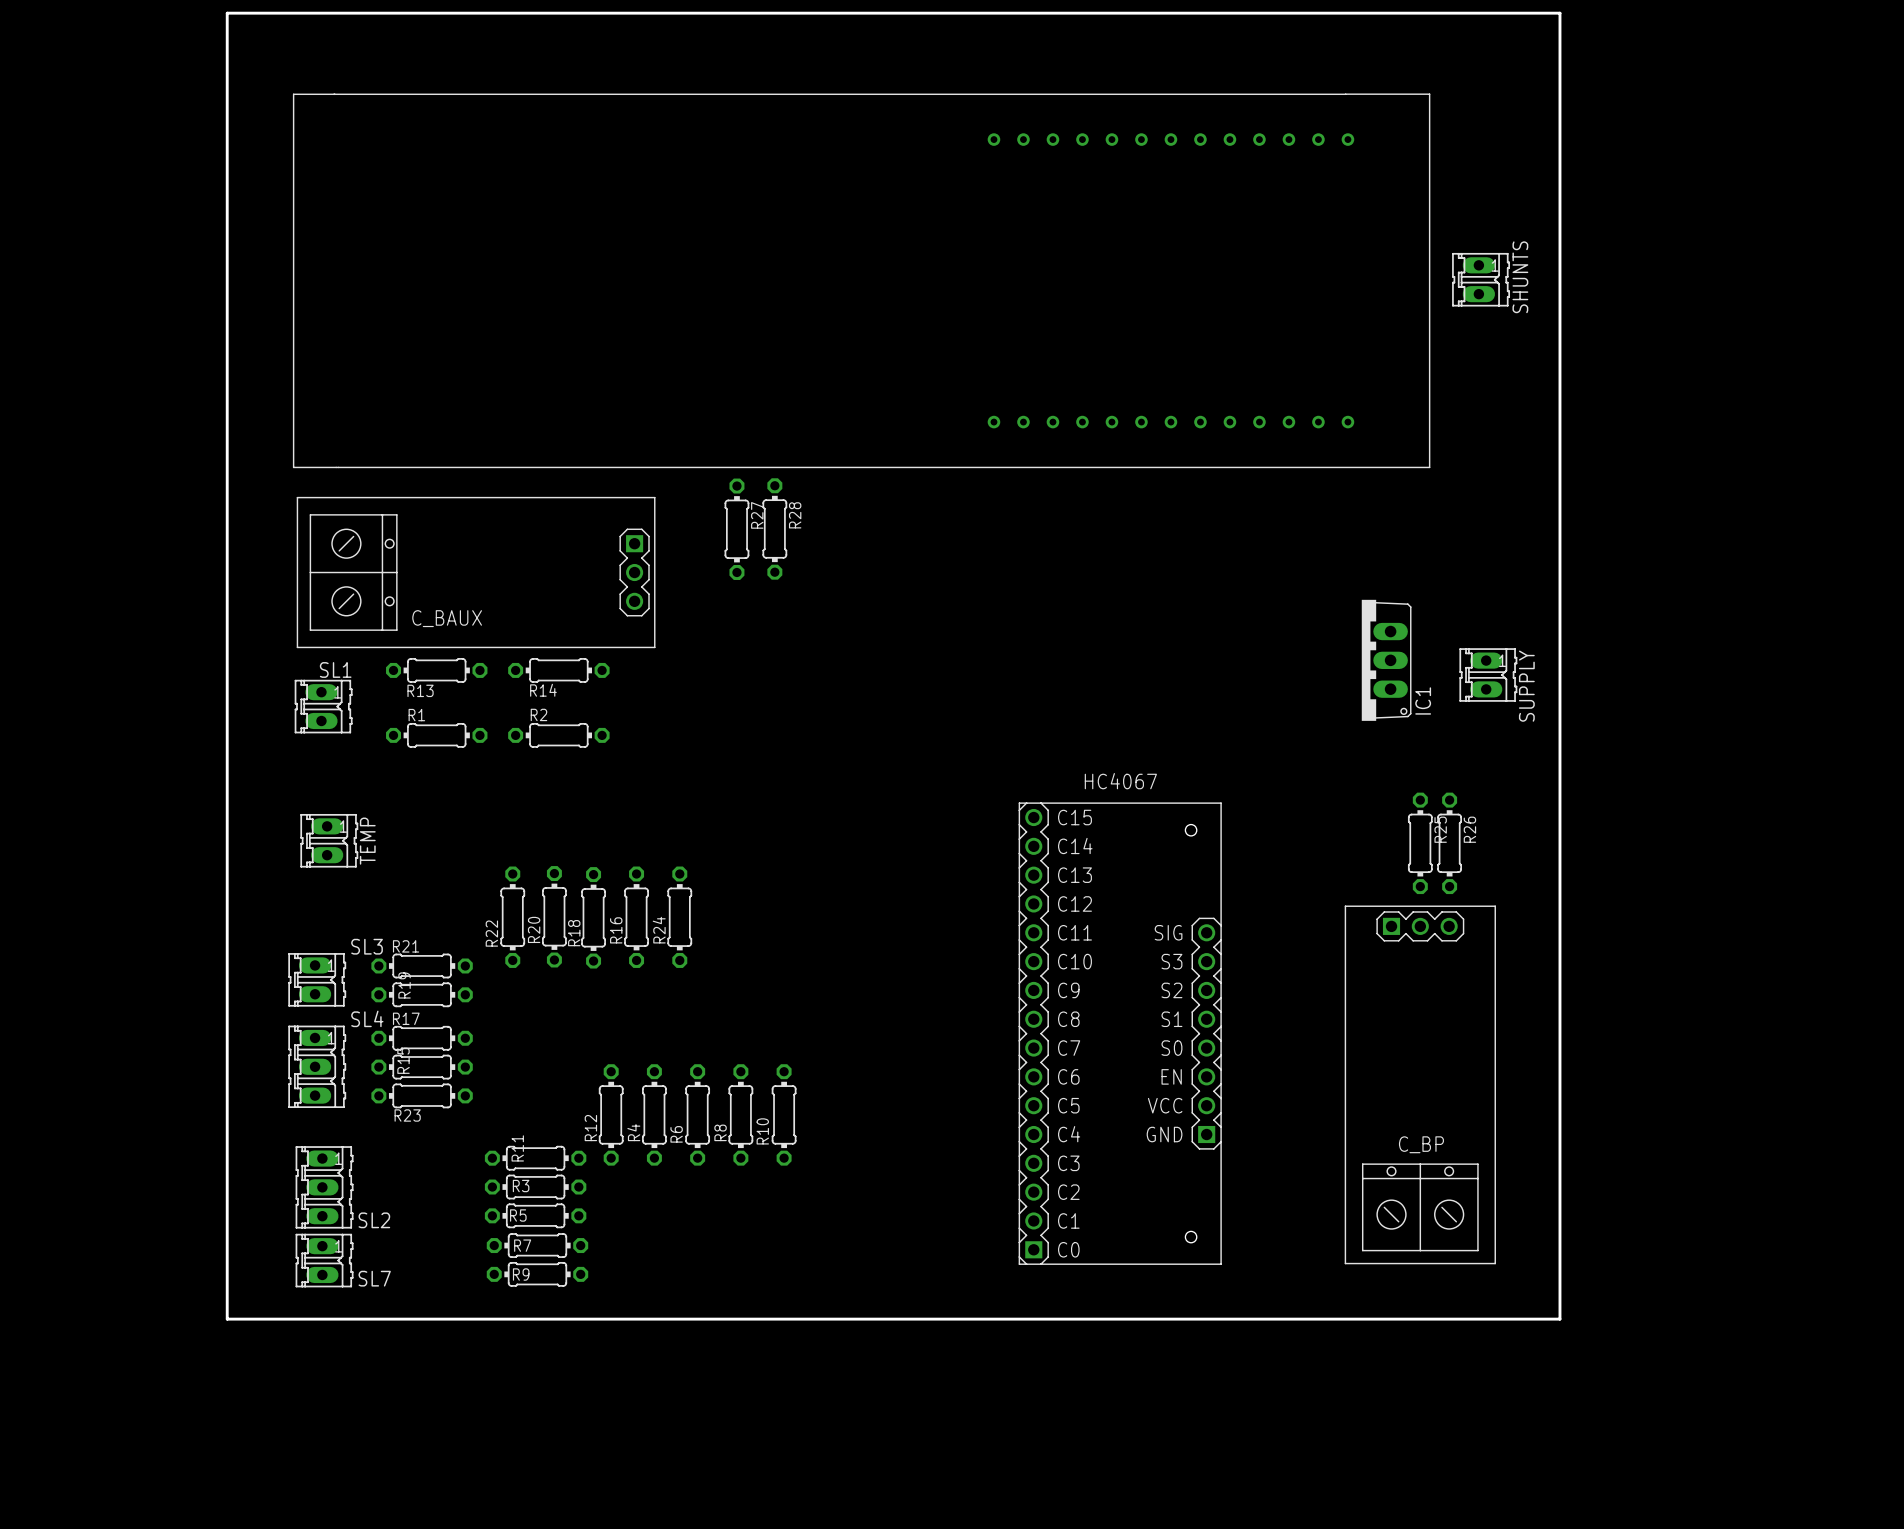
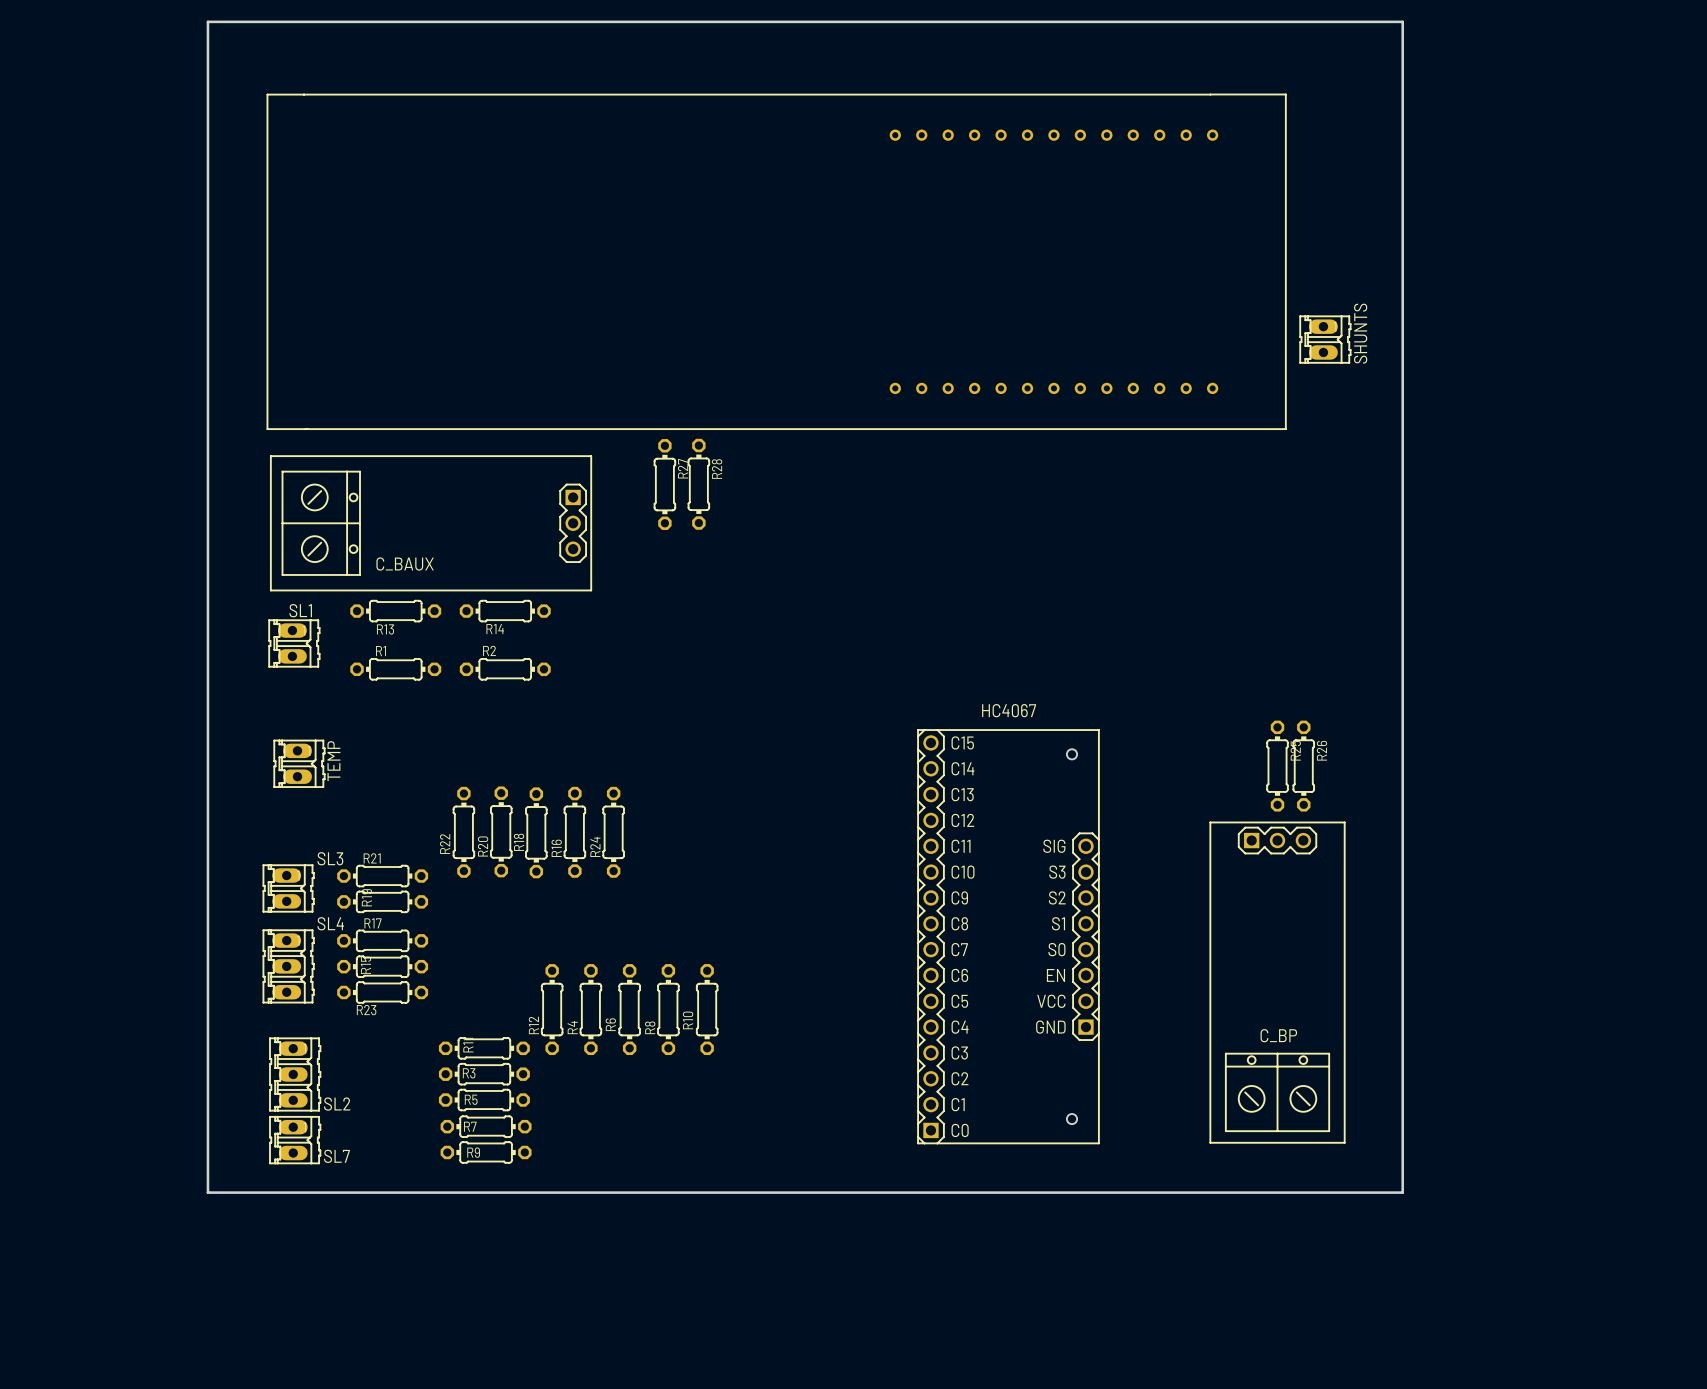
SHUNTS position: (1481, 279) -> (1325, 339)
IC1: (1386, 660) -> none
SUPPLY: (1488, 674) -> none

